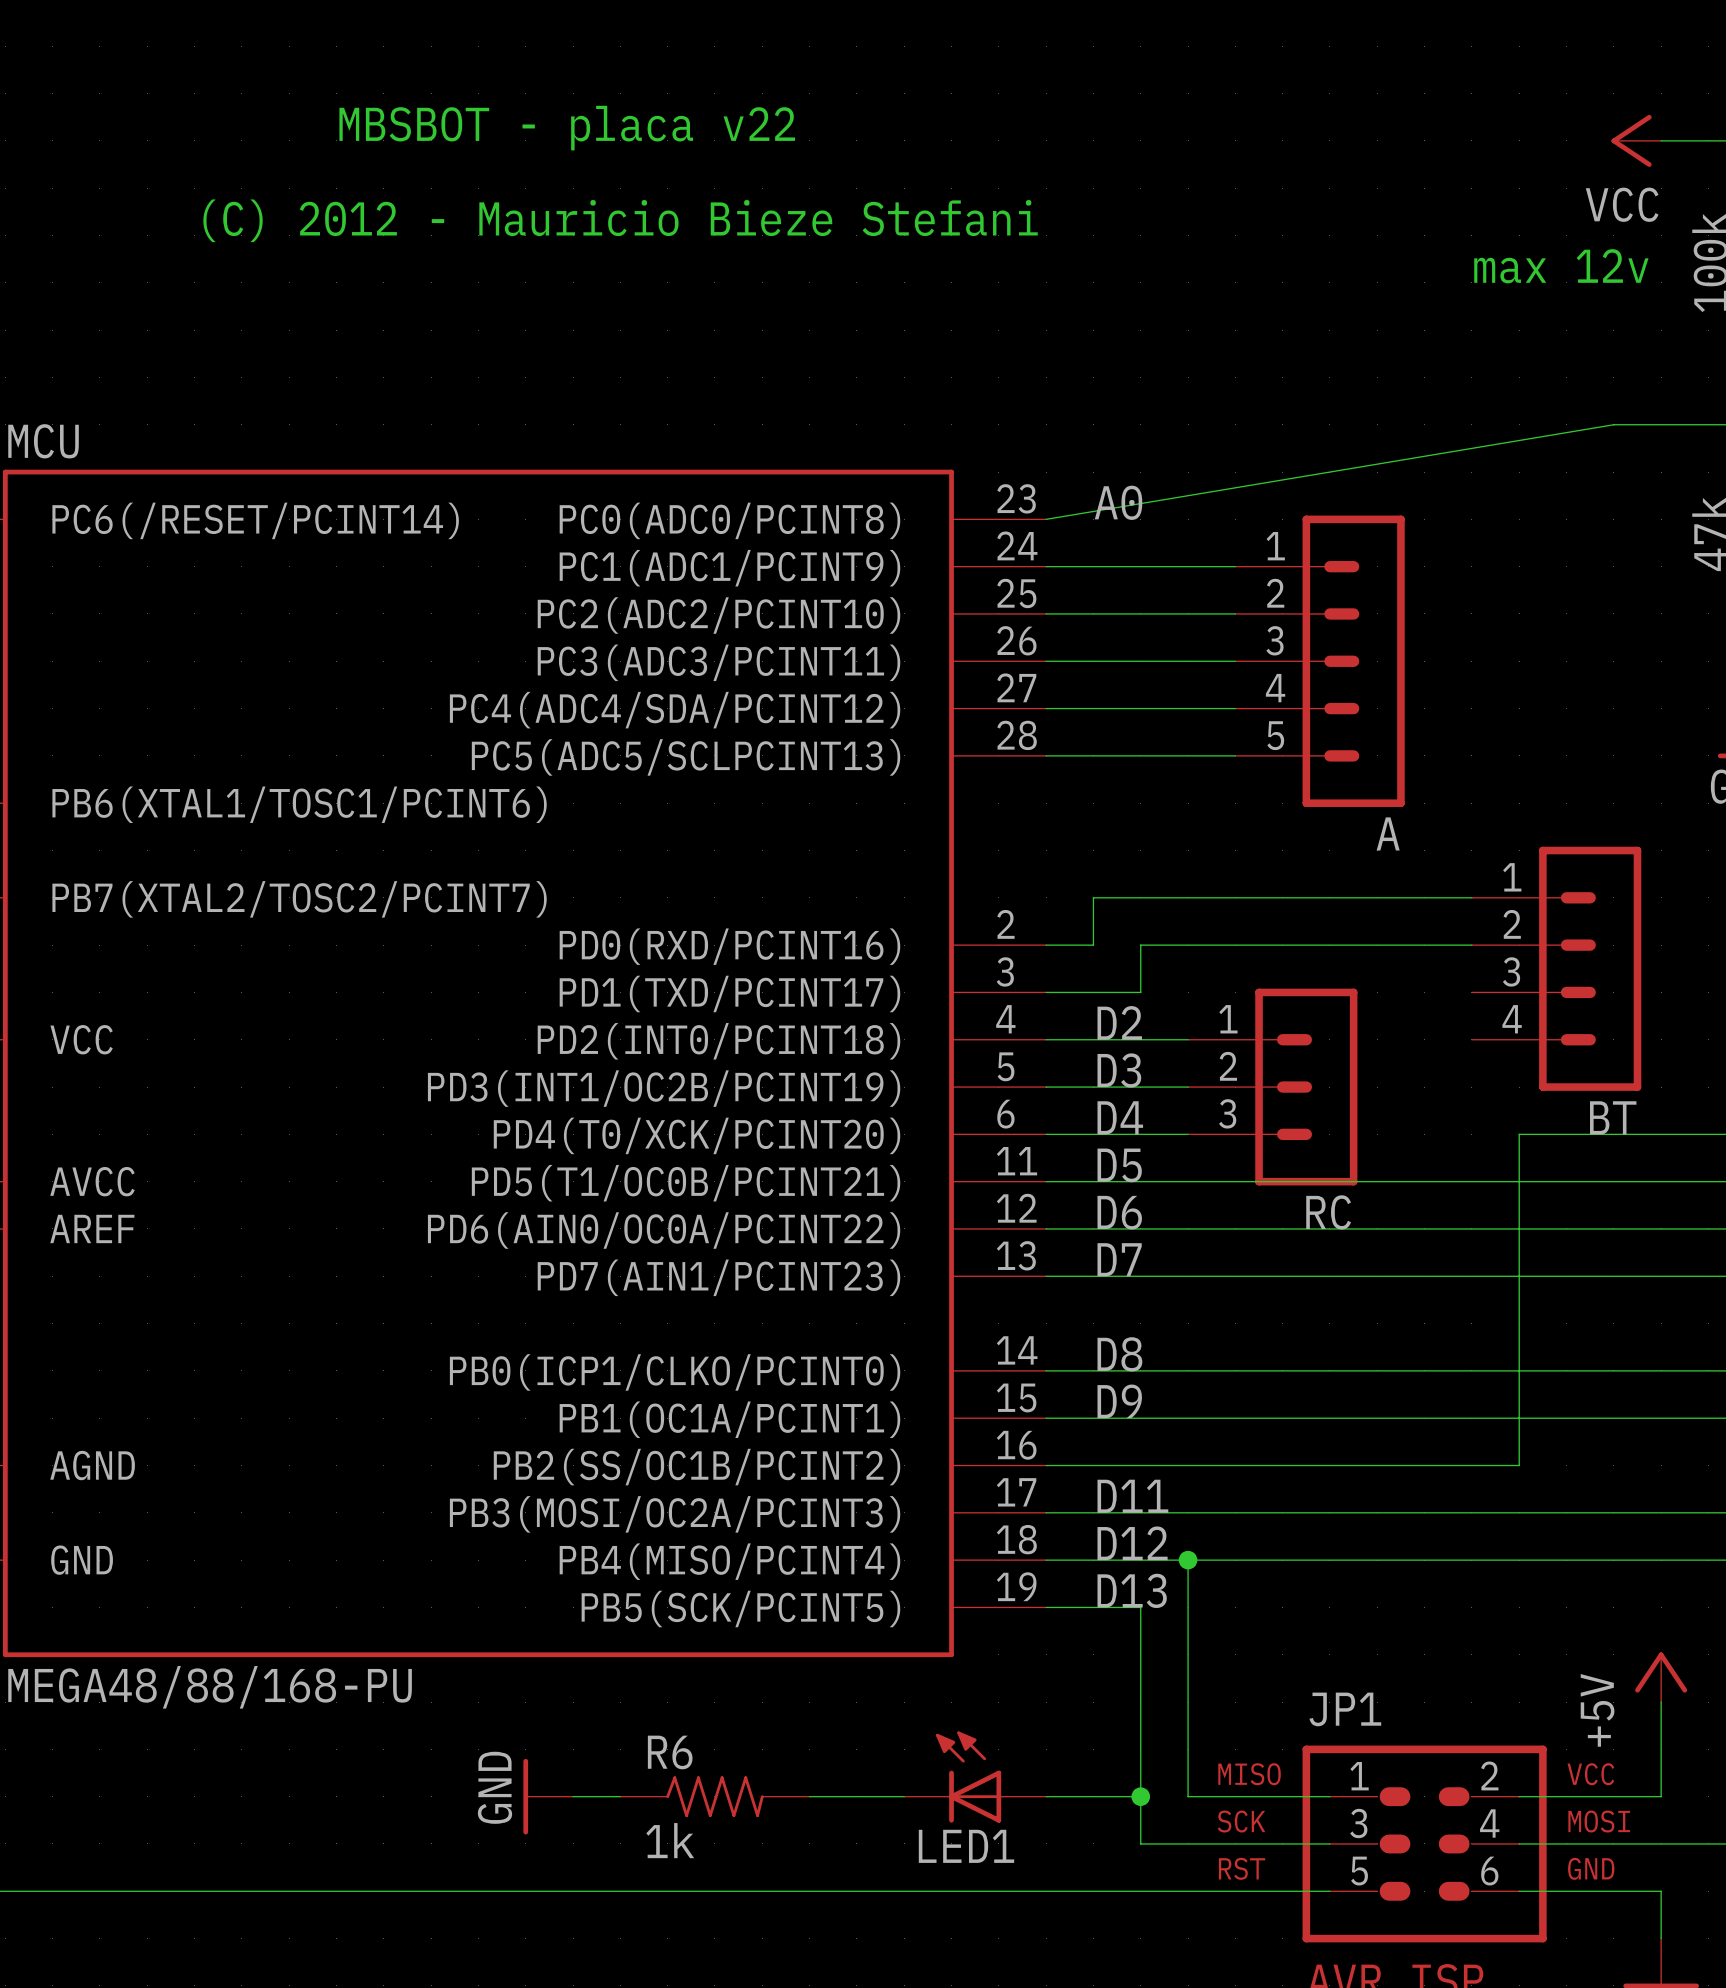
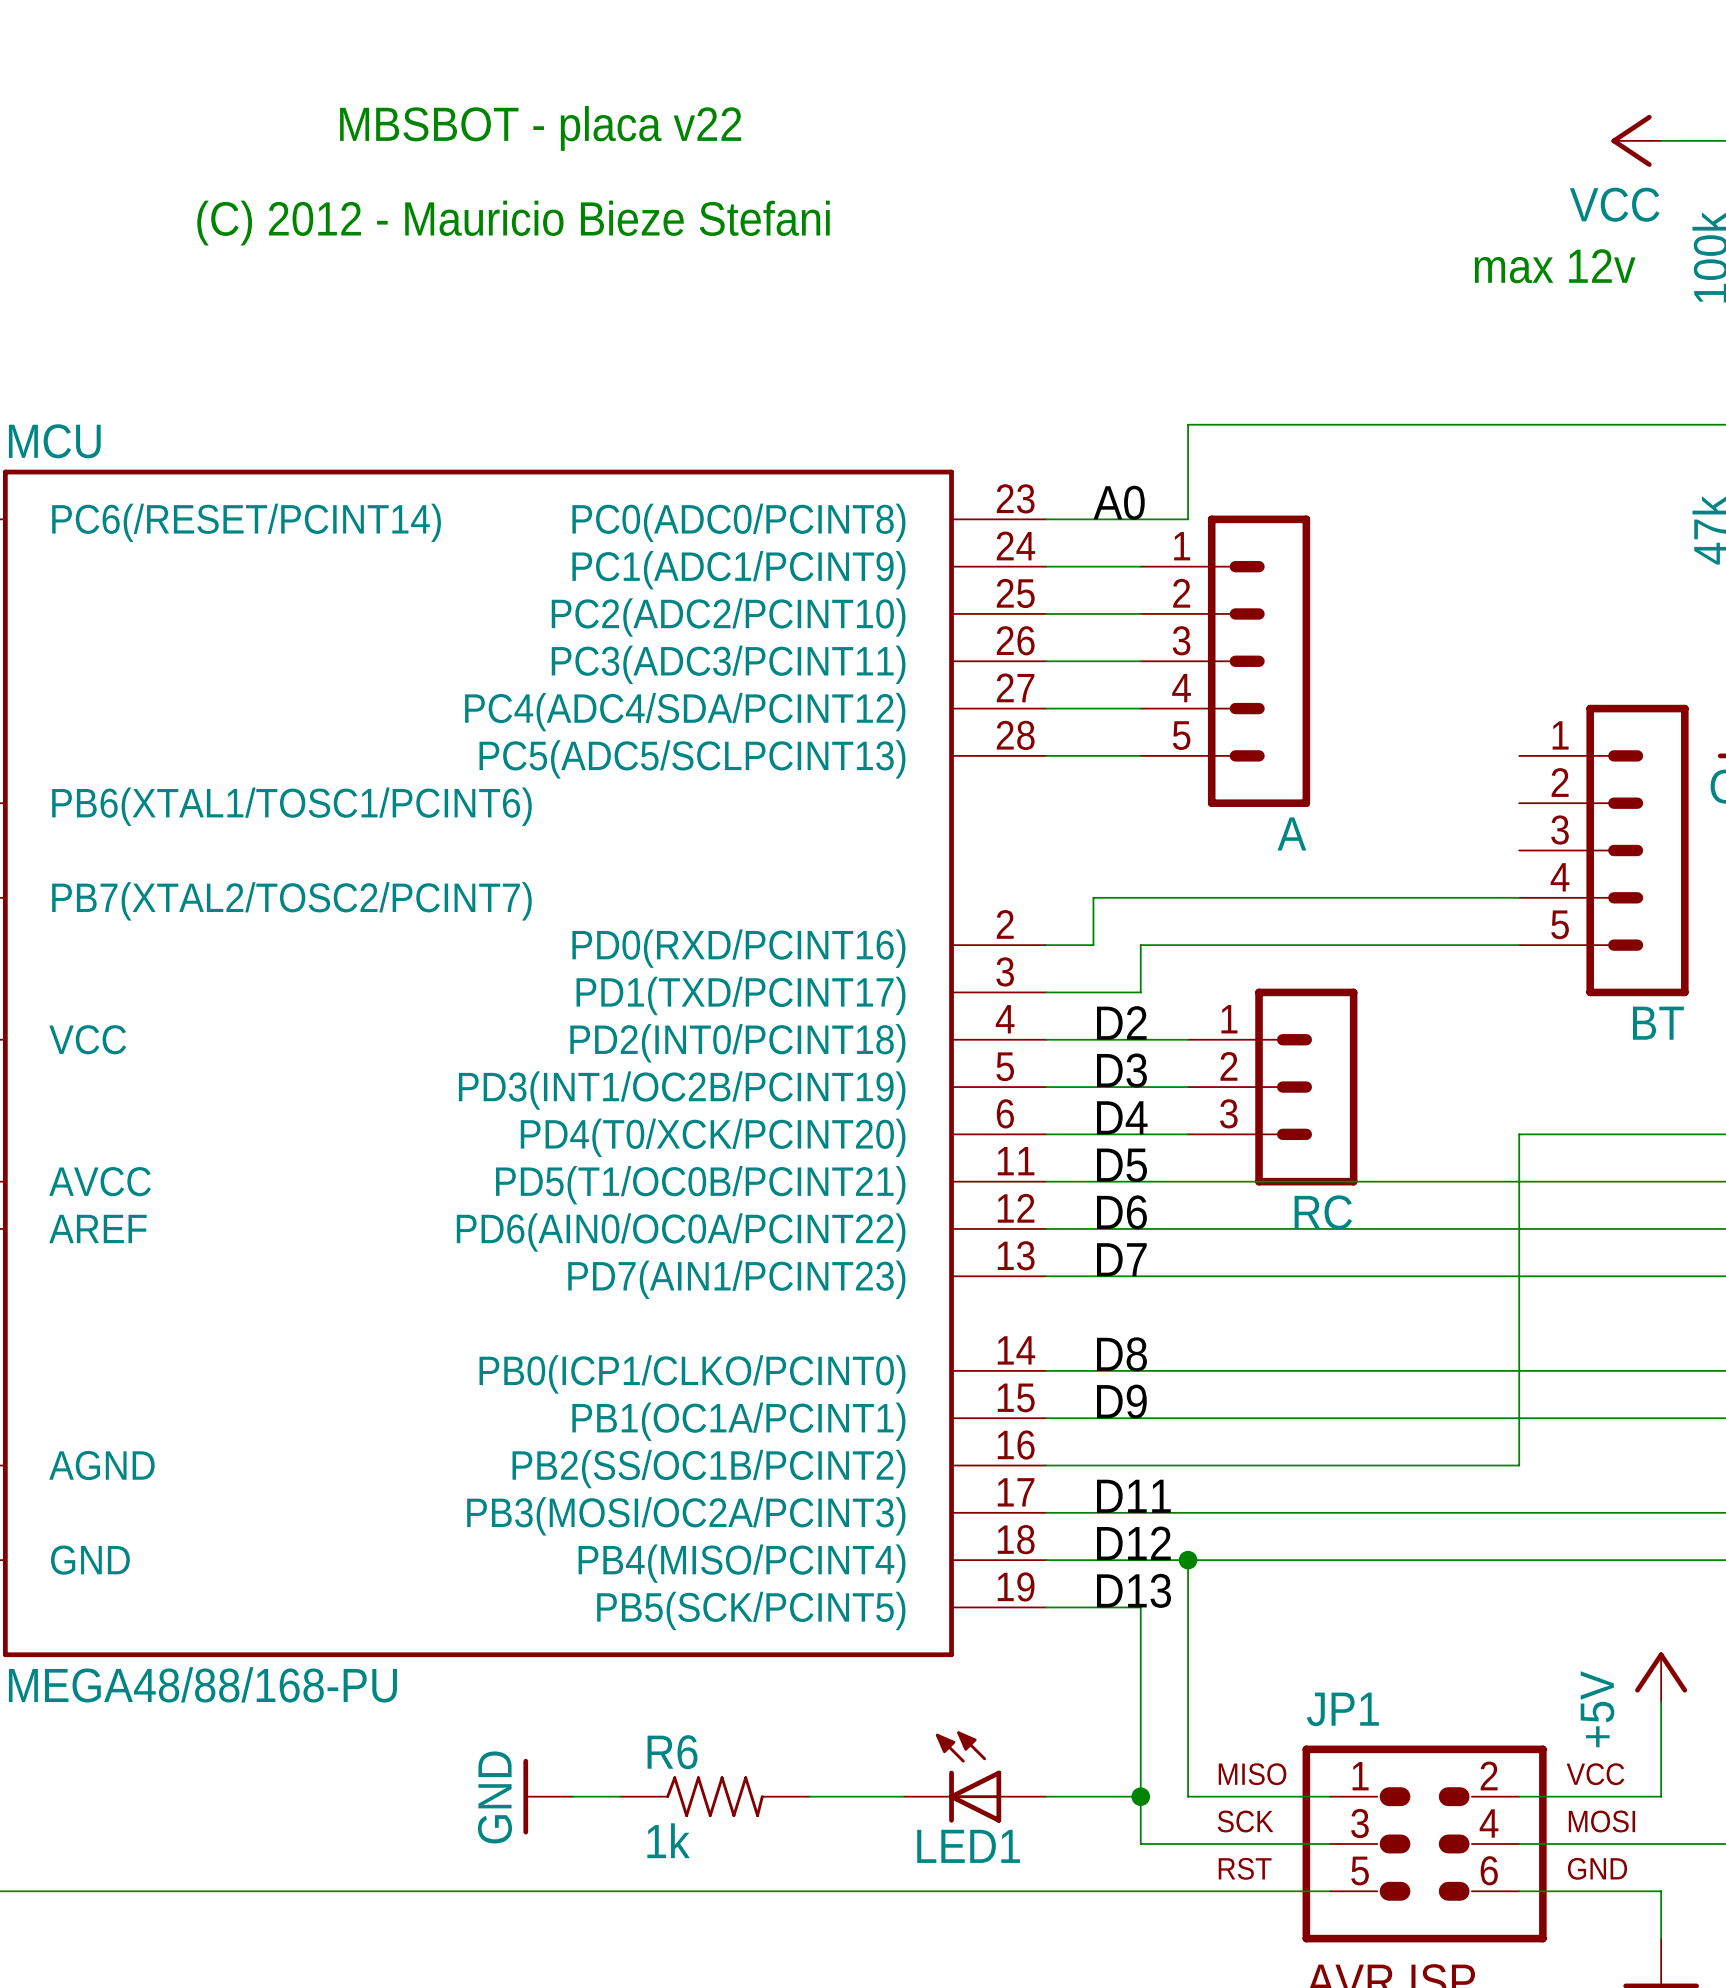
wire: (1613, 424) (1046, 519) -> (1613, 424) (1188, 424) (1188, 519) (1046, 519)
A position: (1320, 661) -> (1225, 661)
BT: none -> (1603, 850)
BT: (1556, 968) -> none

